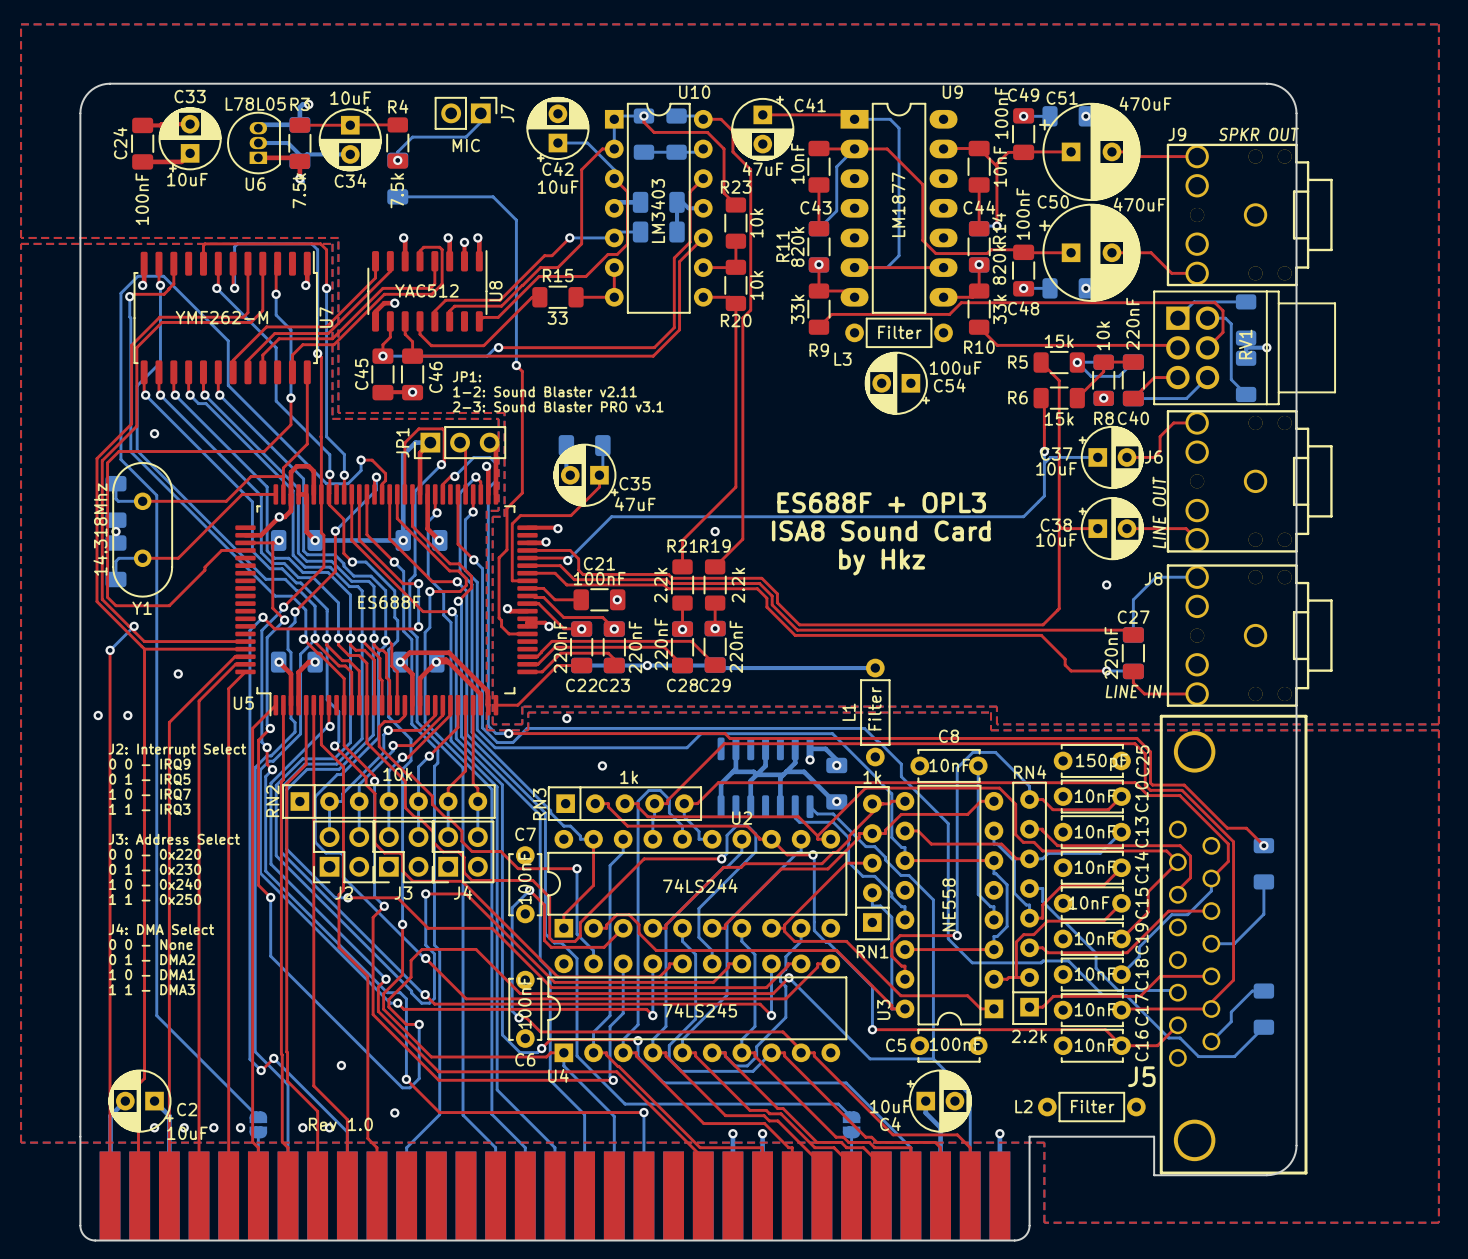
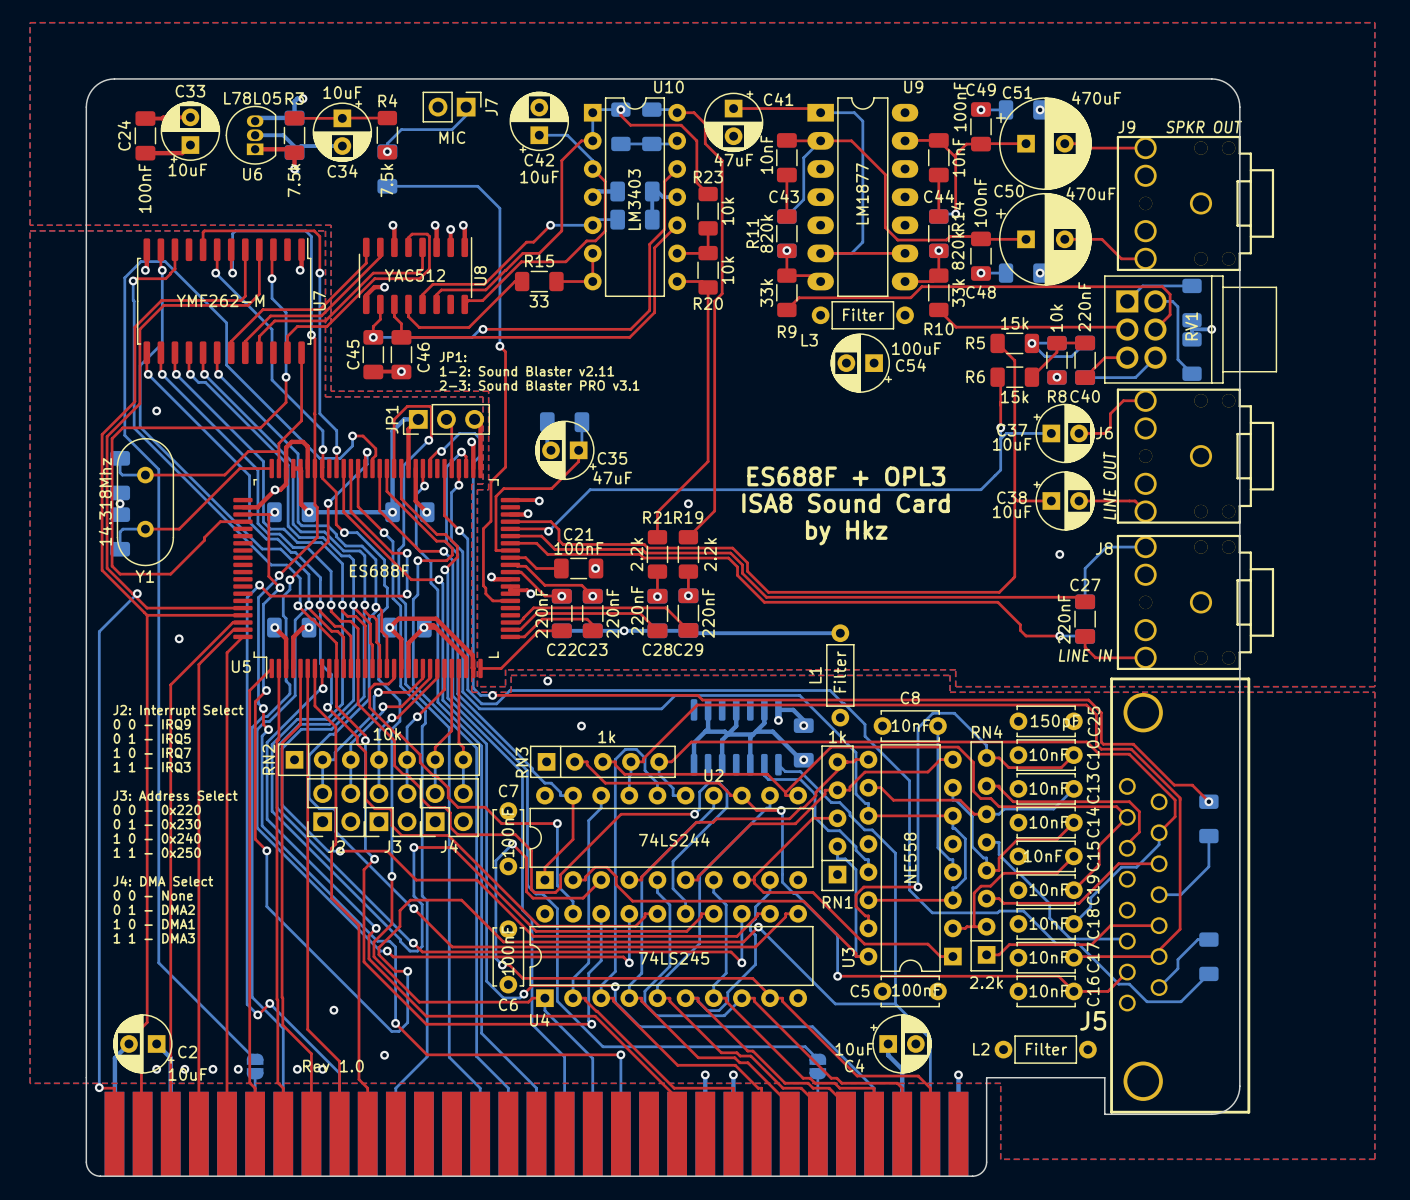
bottom track: none -> (114, 616) (99, 631) (99, 1087)
top track: (110, 650) (110, 1147) -> (99, 1087) (114, 1088)
via: (110, 650) -> none
via: (98, 715) -> none
via: (127, 715) -> none
via: none -> (99, 1087)

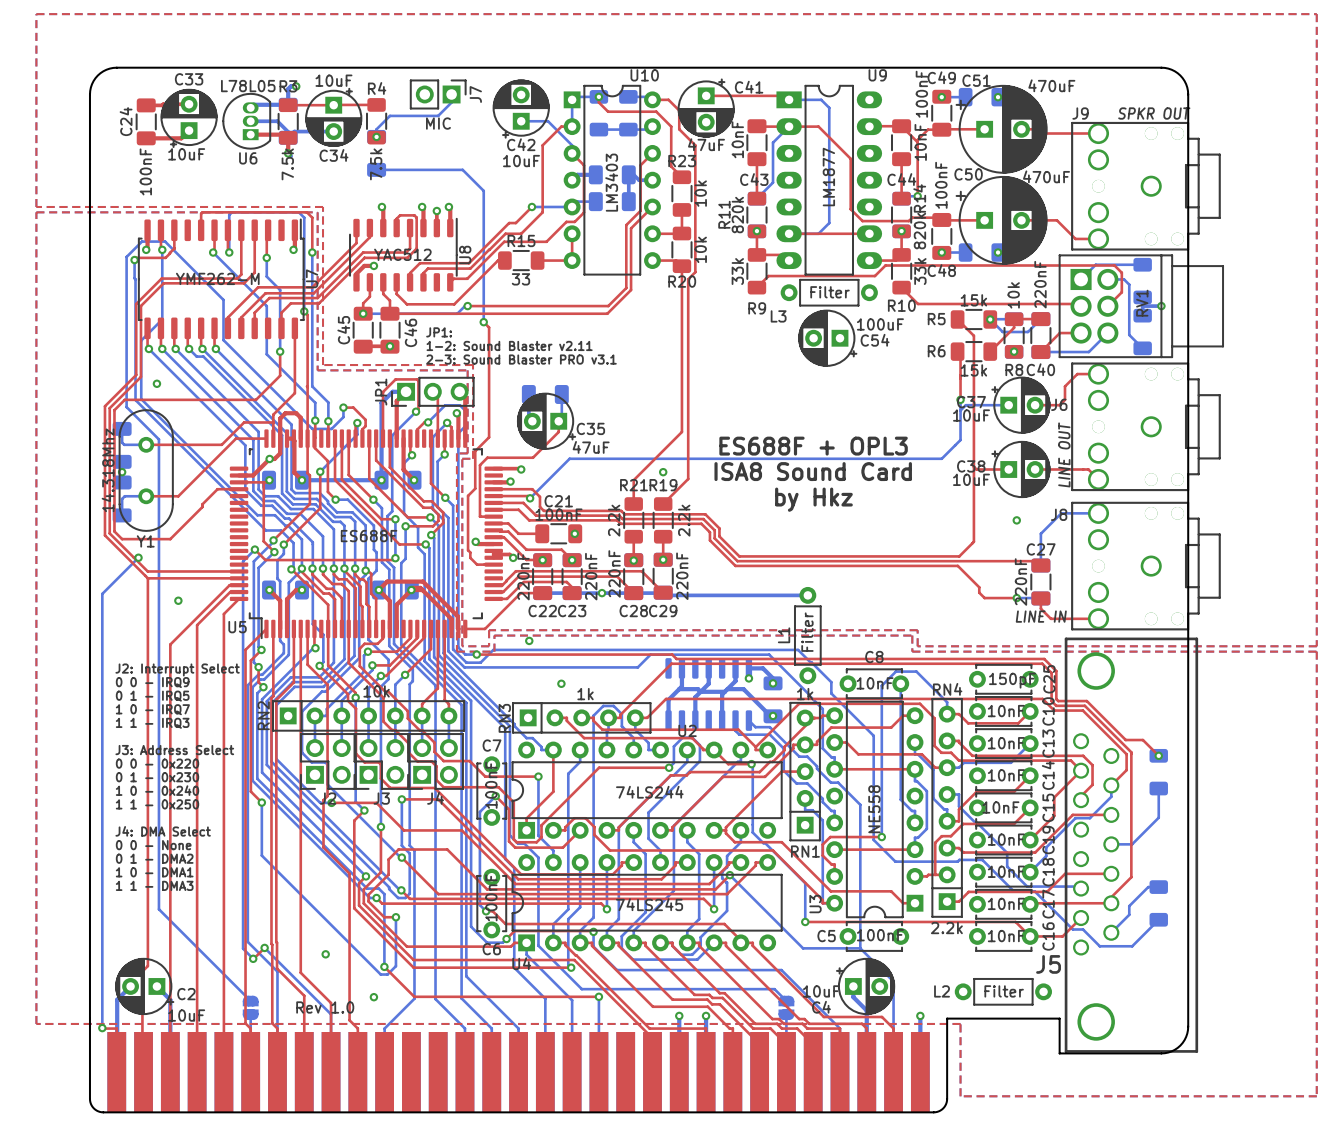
via: (156, 1069) -> none
via: (184, 1069) -> none
via: (212, 1069) -> none
via: (238, 1069) -> none
via: (297, 1069) -> none
via: (322, 1069) -> none

